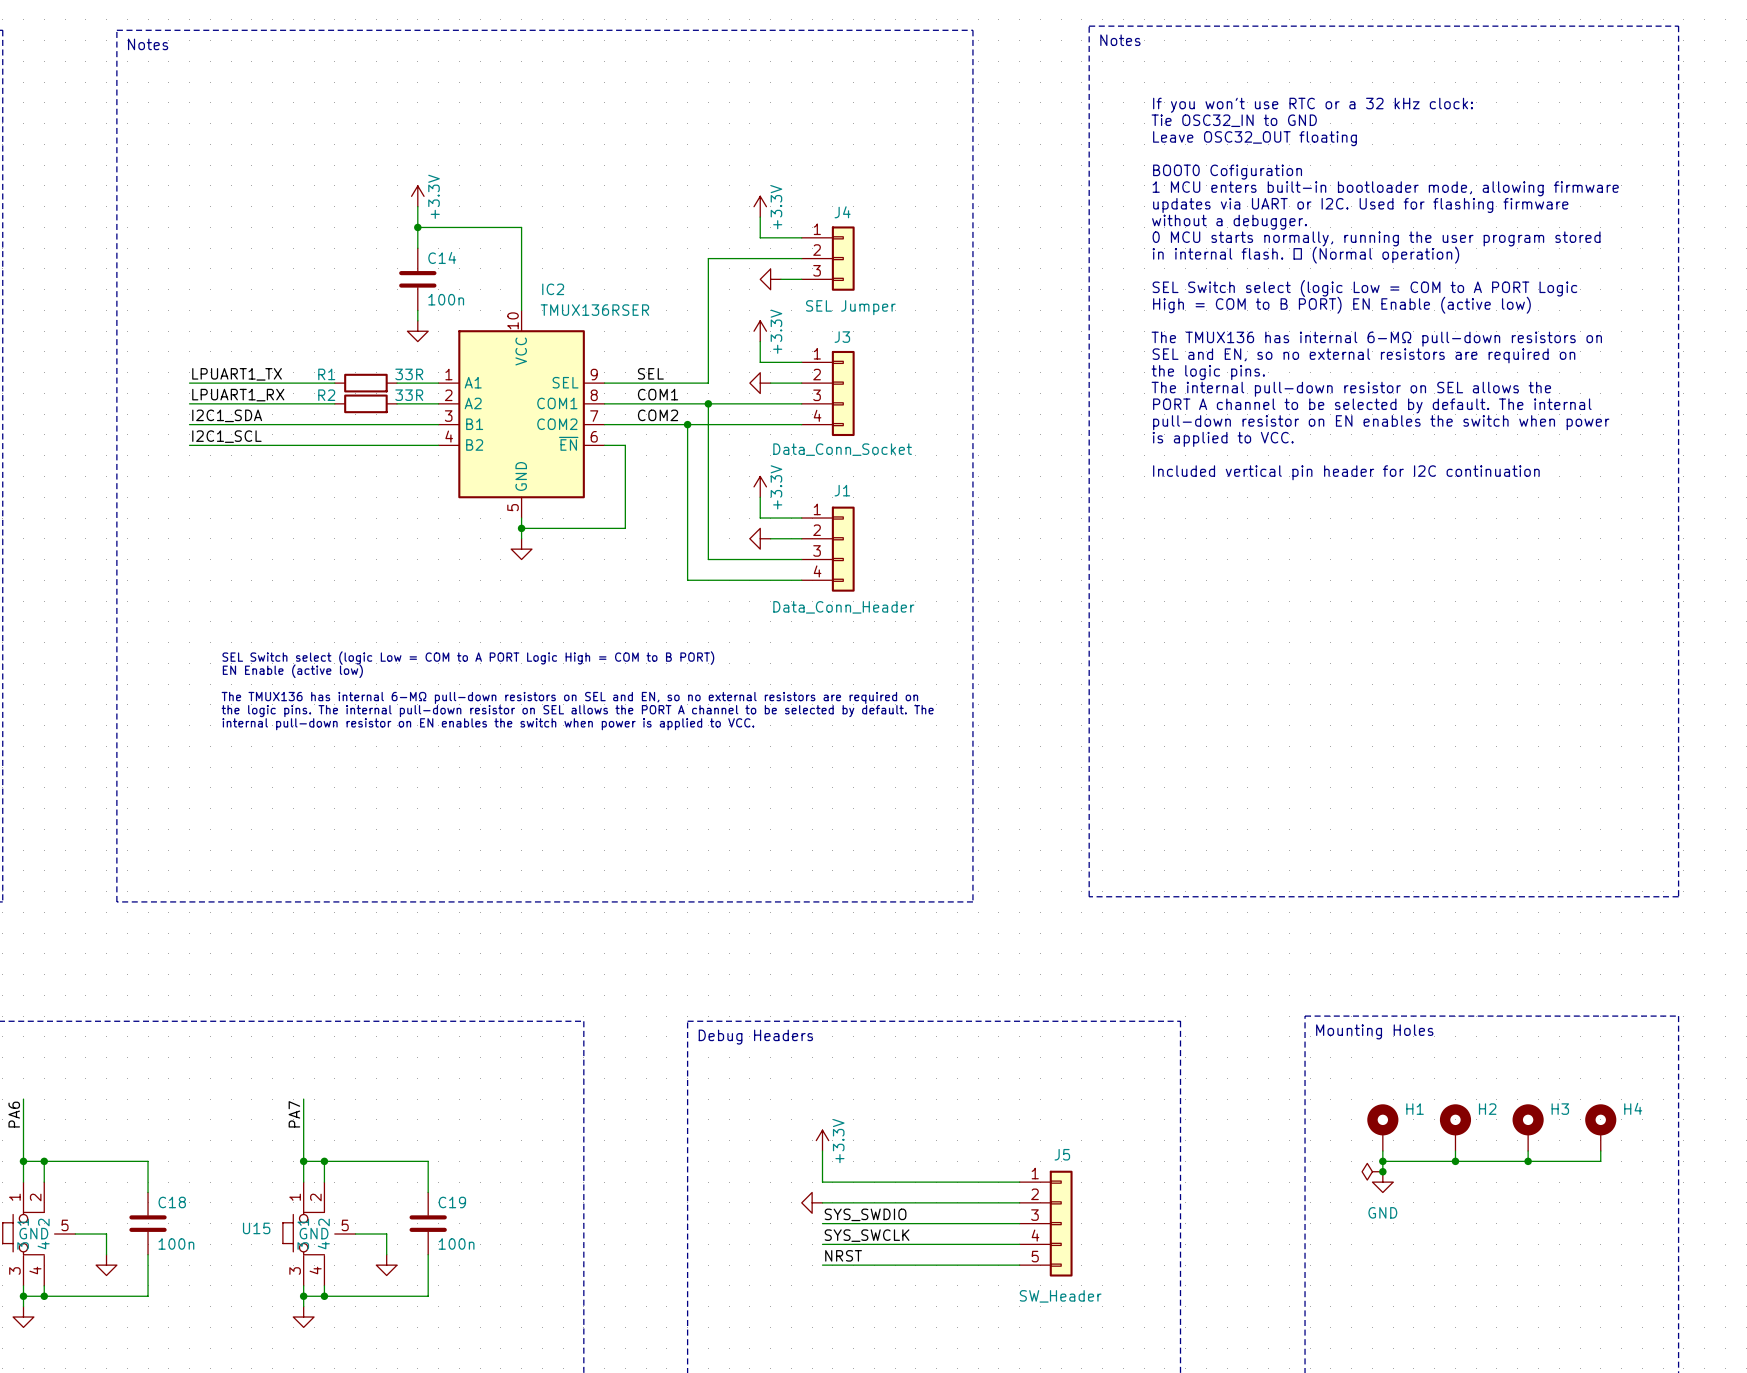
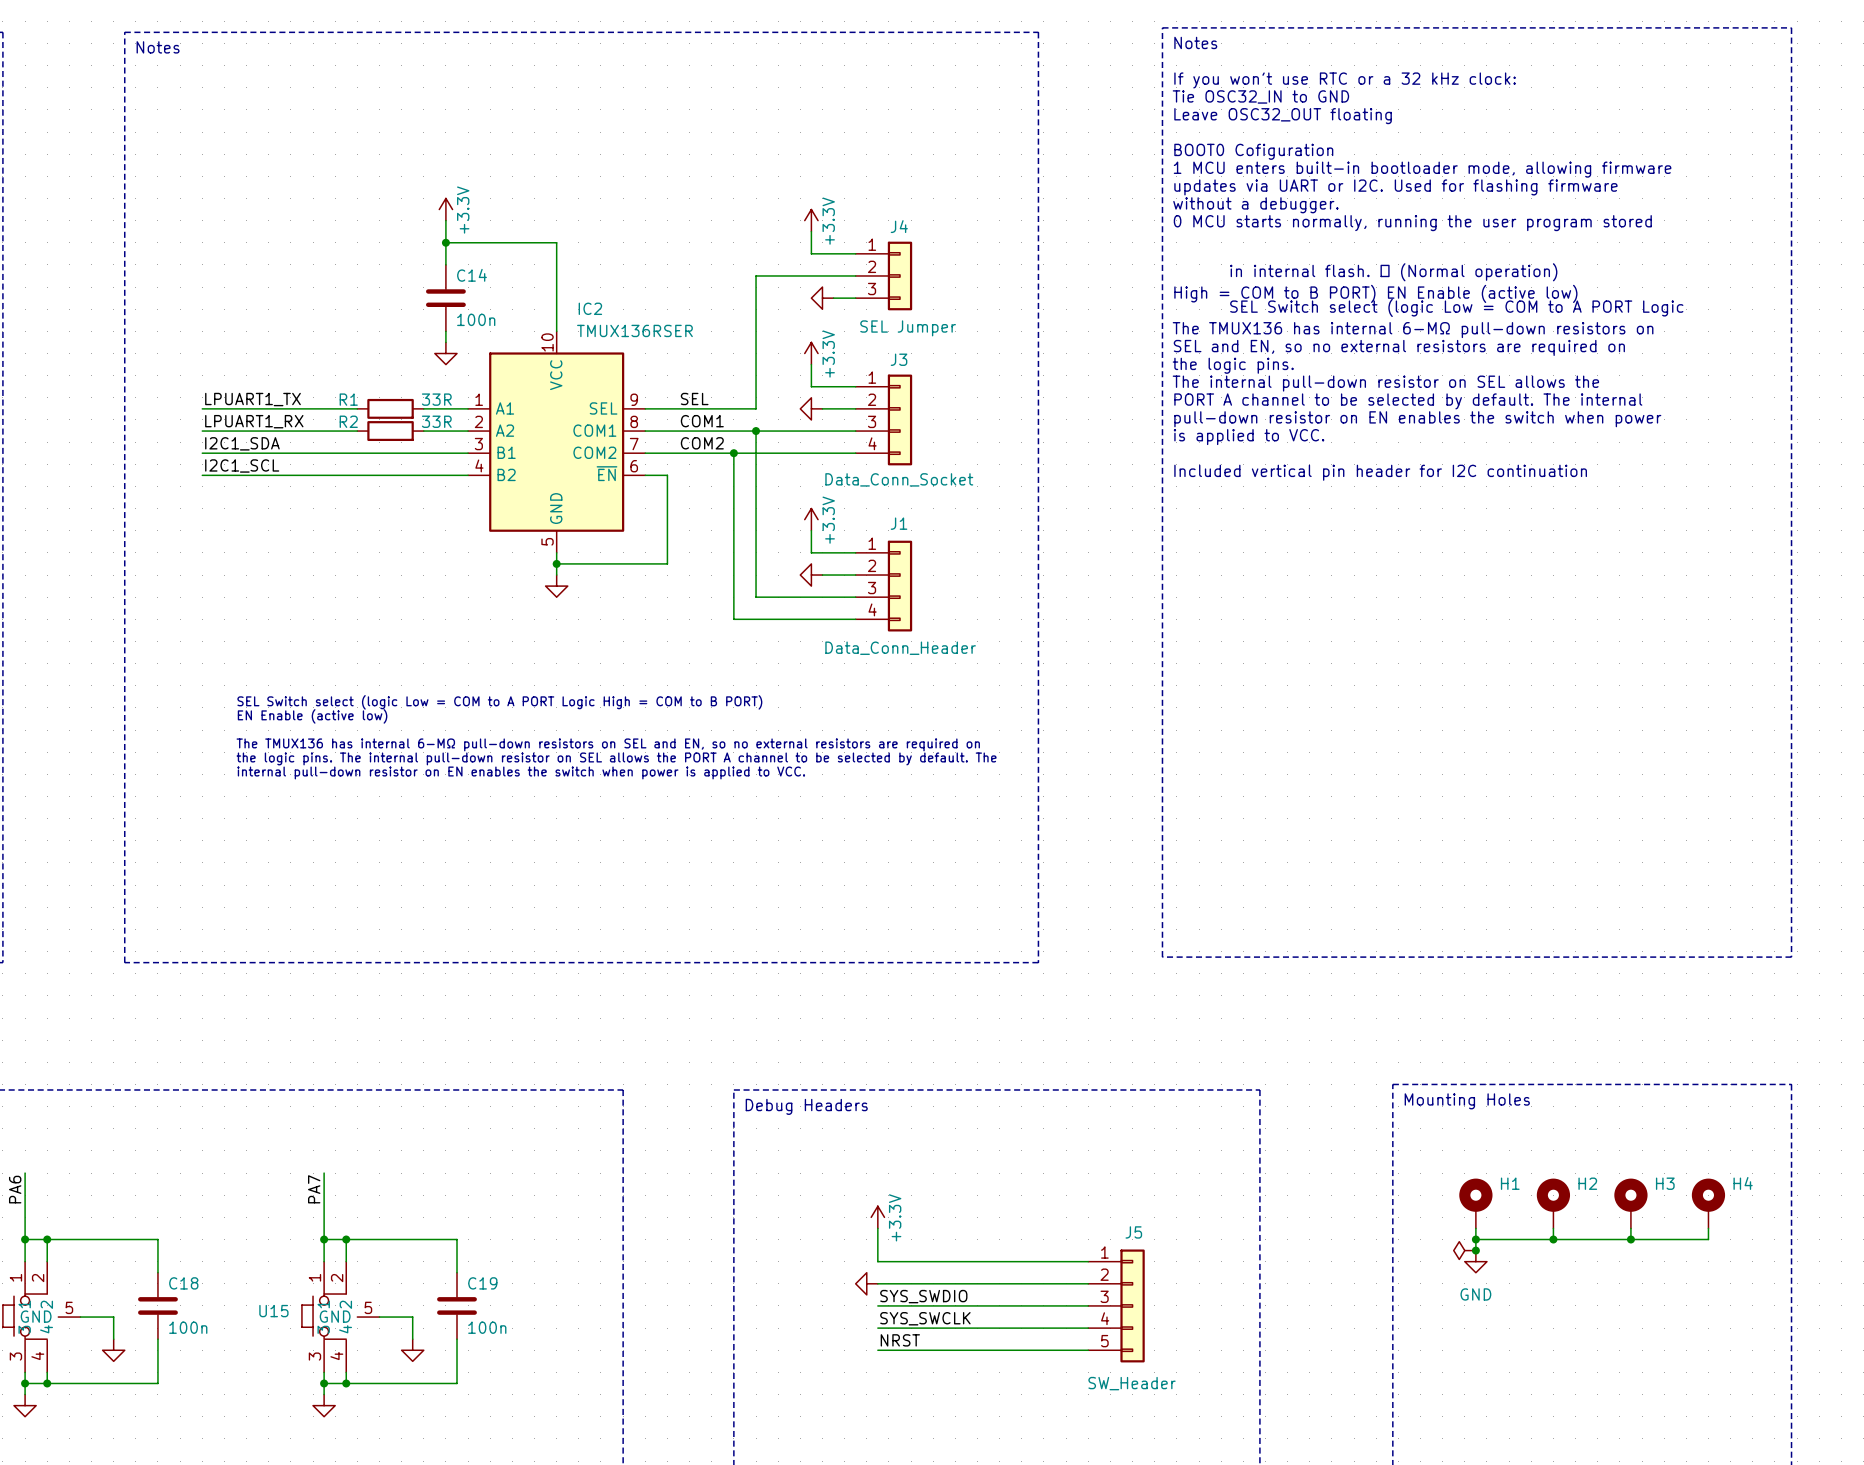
text position: If you won't use RTC or a 32 kHz clock: (1313, 105) -> If you won't use RTC or a 32 kHz clock: (1345, 80)
text position: Tie OSC32_IN to GND (1234, 120) -> Tie OSC32_IN to GND (1260, 96)
text position: Leave OSC32_OUT floating (1254, 138) -> Leave OSC32_OUT floating (1283, 116)
text position: BOOT0 Cofiguration (1227, 172) -> BOOT0 Cofiguration (1253, 151)
text position: 1 MCU enters built-in bootloader mode, allowing firmware (1385, 188) -> 1 MCU enters built-in bootloader mode, allowing firmware (1422, 169)
text position: updates via UART or I2C. Used for flashing firmware (1360, 205) -> updates via UART or I2C. Used for flashing firmware (1395, 187)
text position: without a debugger. (1229, 222) -> without a debugger. (1255, 205)
text position: 0 MCU starts normally, running the user program stored (1376, 238) -> 0 MCU starts normally, running the user program stored (1412, 223)
text position: High = COM to B PORT) EN Enable (active low) (1341, 305) -> High = COM to B PORT) EN Enable (active low) (1375, 293)
text position: The TMUX136 has internal 6-MΩ pull-down resistors on (1376, 339) -> The TMUX136 has internal 6-MΩ pull-down resistors on (1413, 330)
text position: SEL and EN, so no external resistors are required on (1363, 355) -> SEL and EN, so no external resistors are required on (1399, 347)
text position: the logic pins. (1208, 372) -> the logic pins. (1233, 365)
text position: The internal pull-down resistor on SEL allows the (1351, 389) -> The internal pull-down resistor on SEL allows the (1385, 383)
text position: PORT A channel to be selected by default. The internal (1372, 405) -> PORT A channel to be selected by default. The internal (1408, 401)
text position: pull-down resistor on EN enables the switch when power (1381, 422) -> pull-down resistor on EN enables the switch when power (1417, 419)
text position: is applied to VCC. (1223, 439) -> is applied to VCC. (1249, 437)
text position: Included vertical pin header for I2C continuation (1346, 472) -> Included vertical pin header for I2C continuation (1380, 472)

